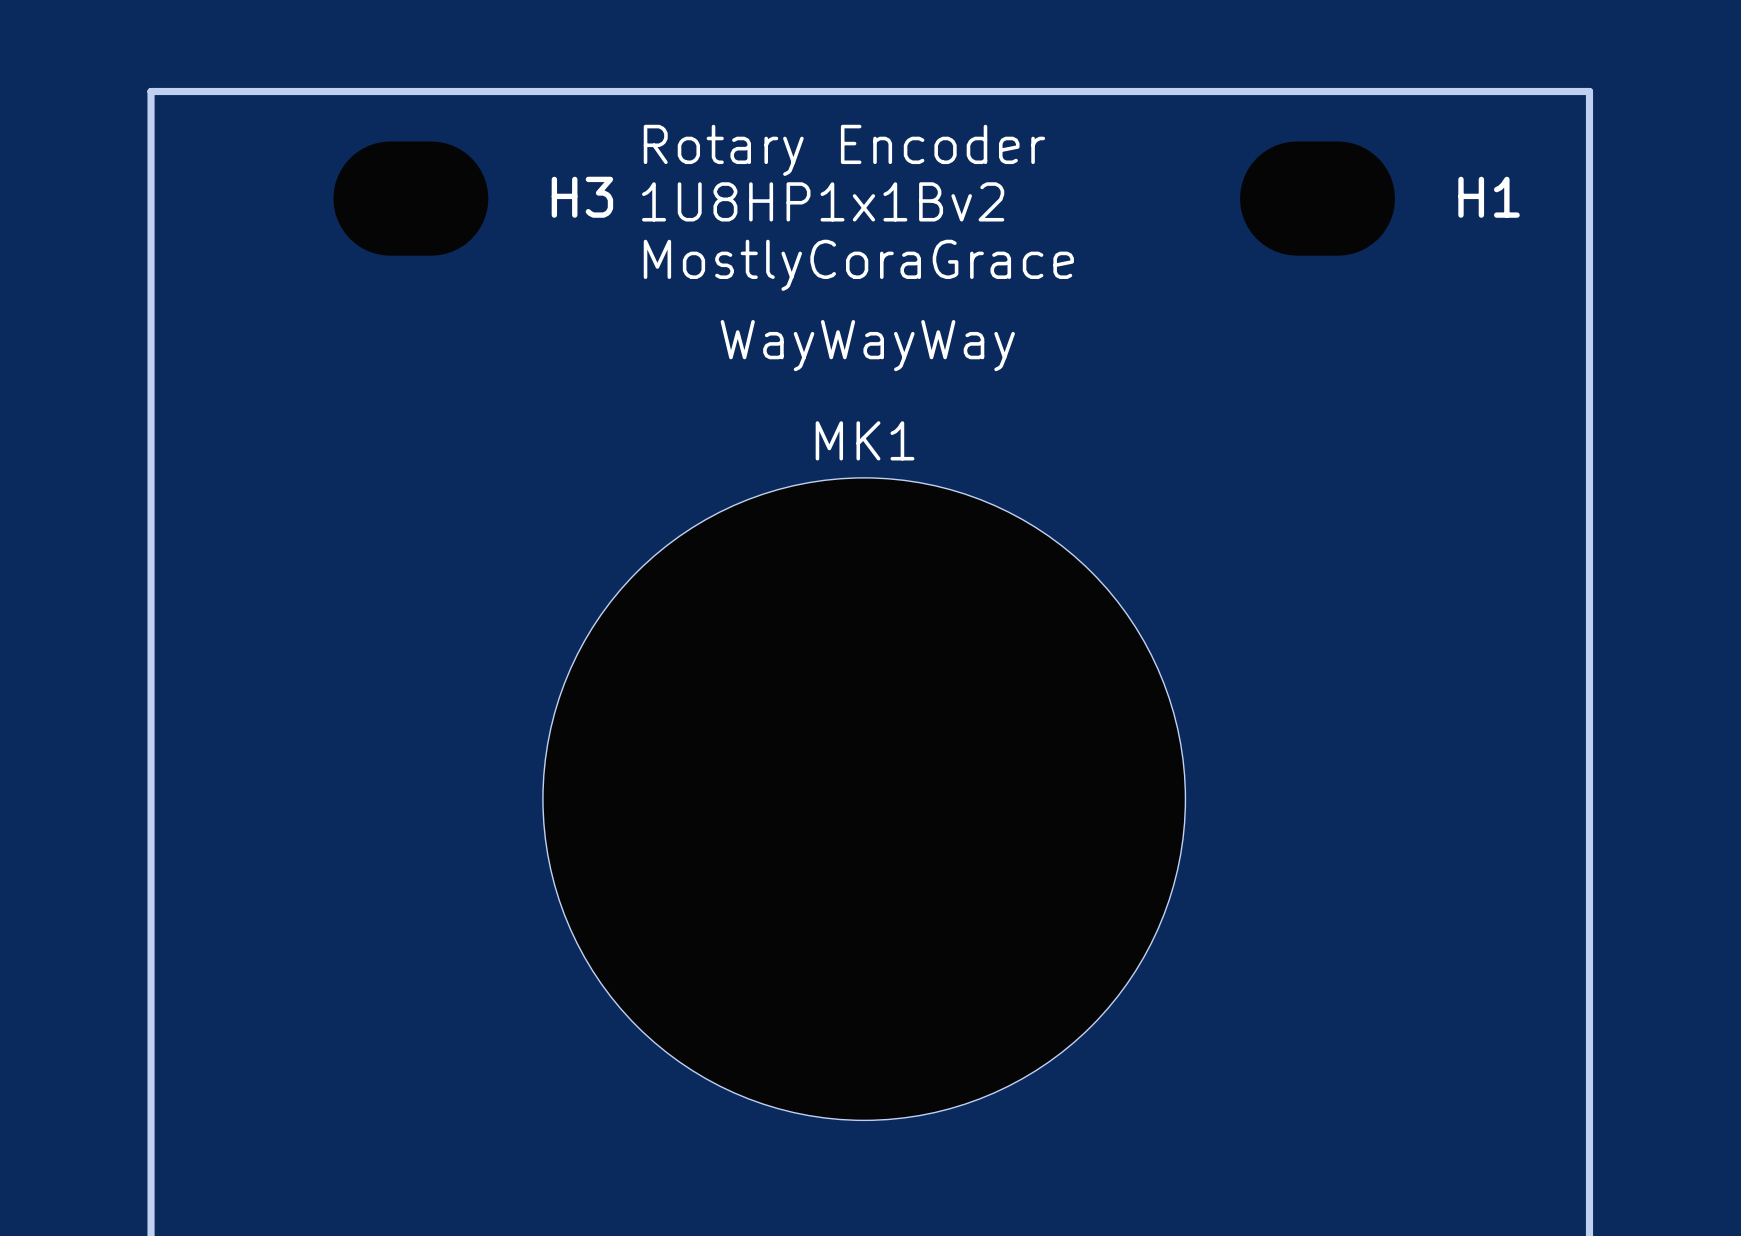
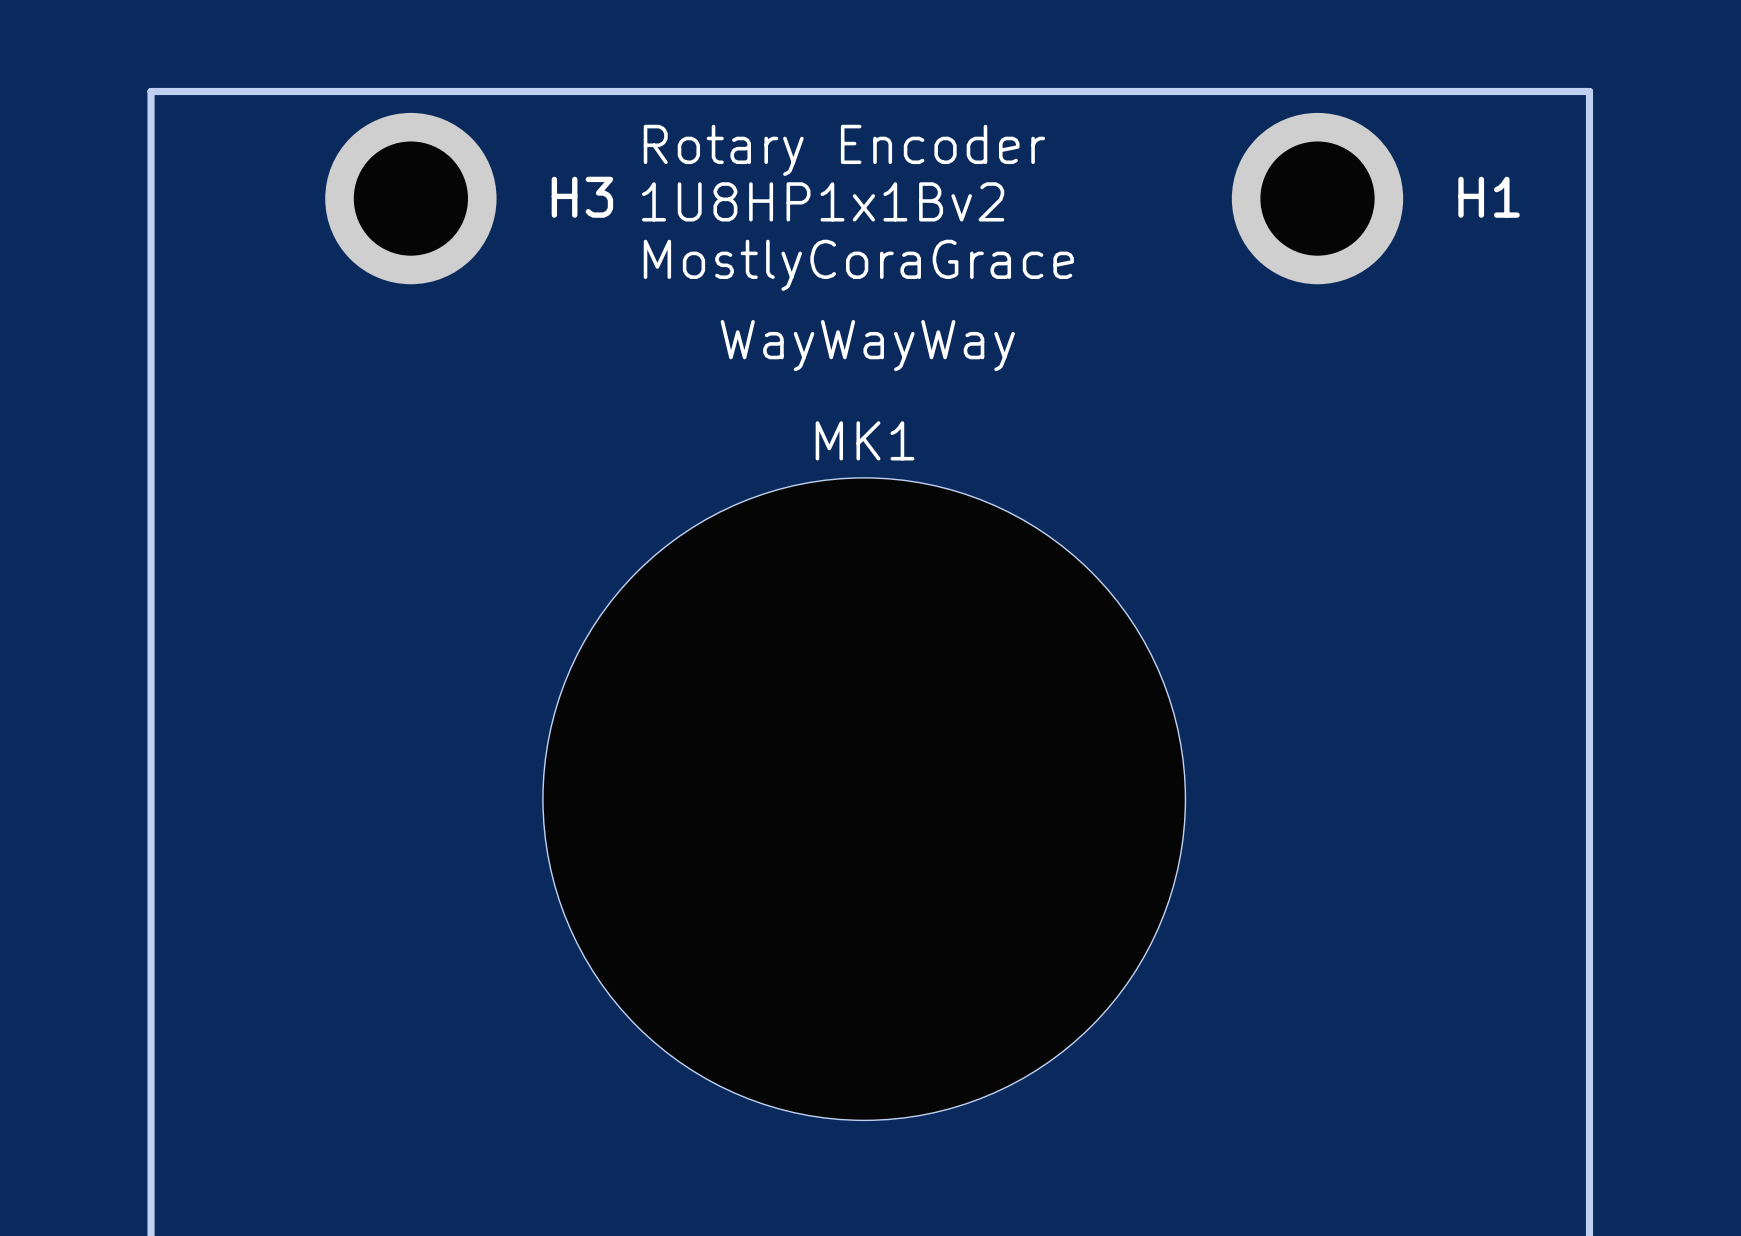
H3 footprint: [333, 141, 489, 256] -> [325, 112, 497, 285]
H1 footprint: [1240, 141, 1395, 256] -> [1231, 112, 1404, 285]

